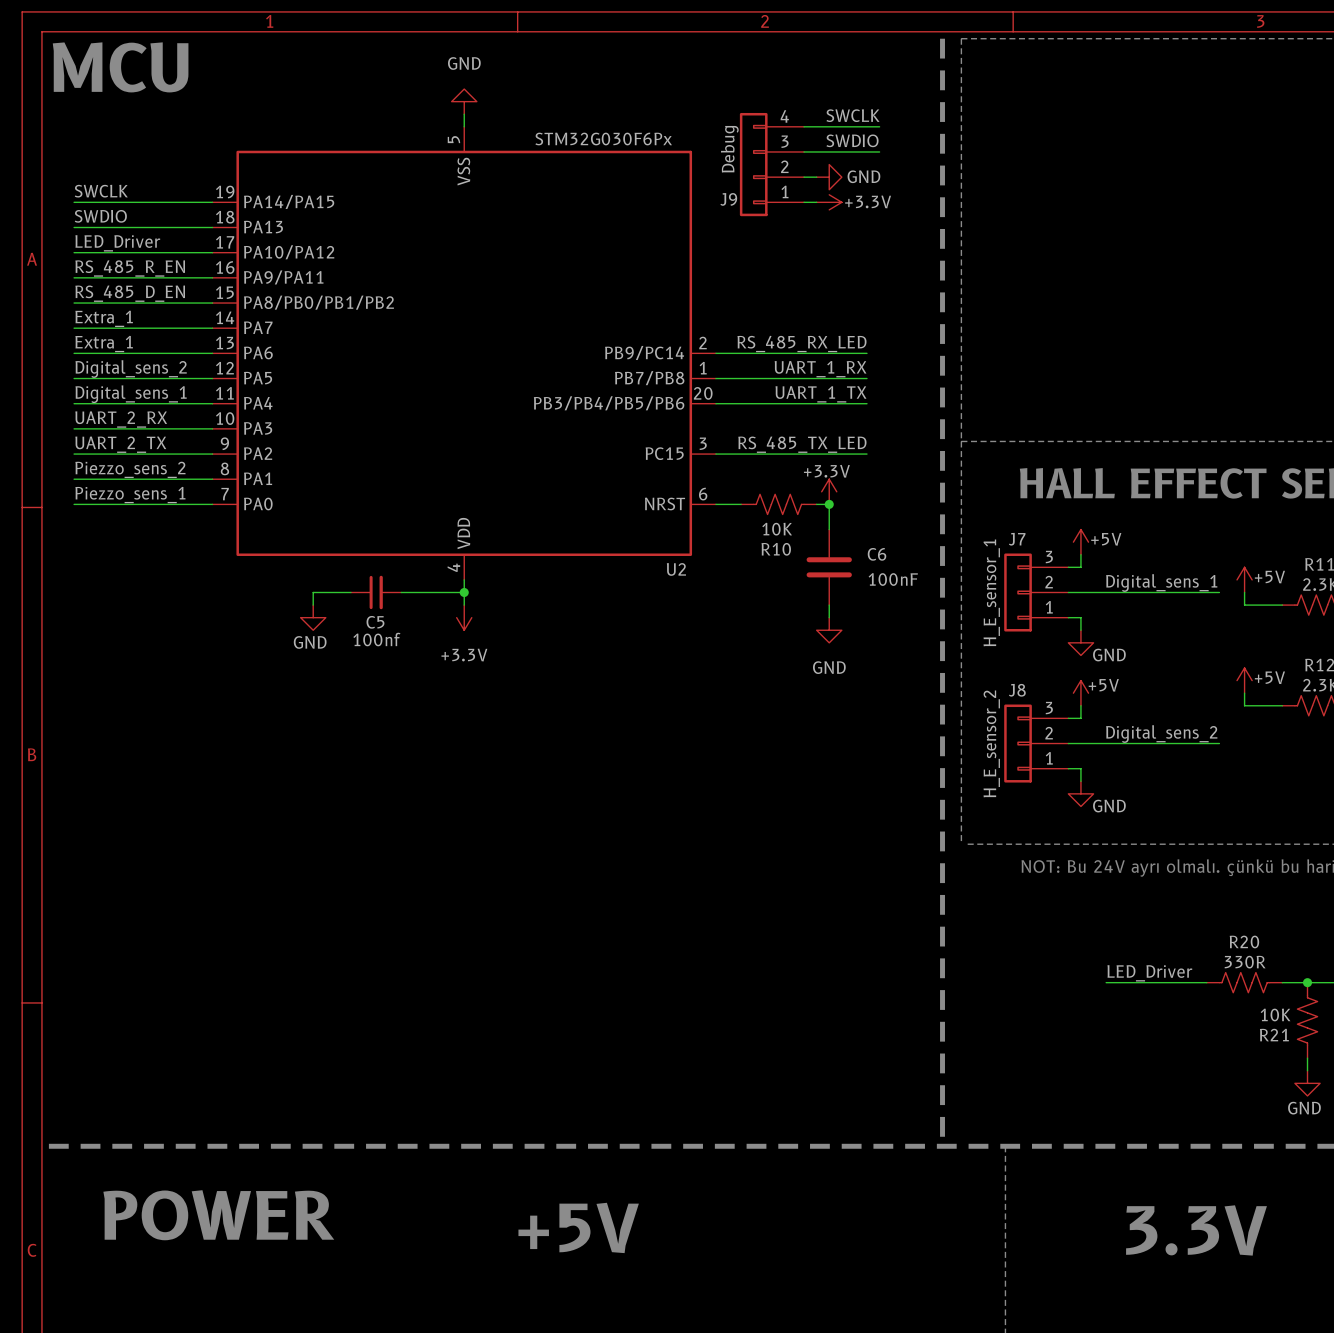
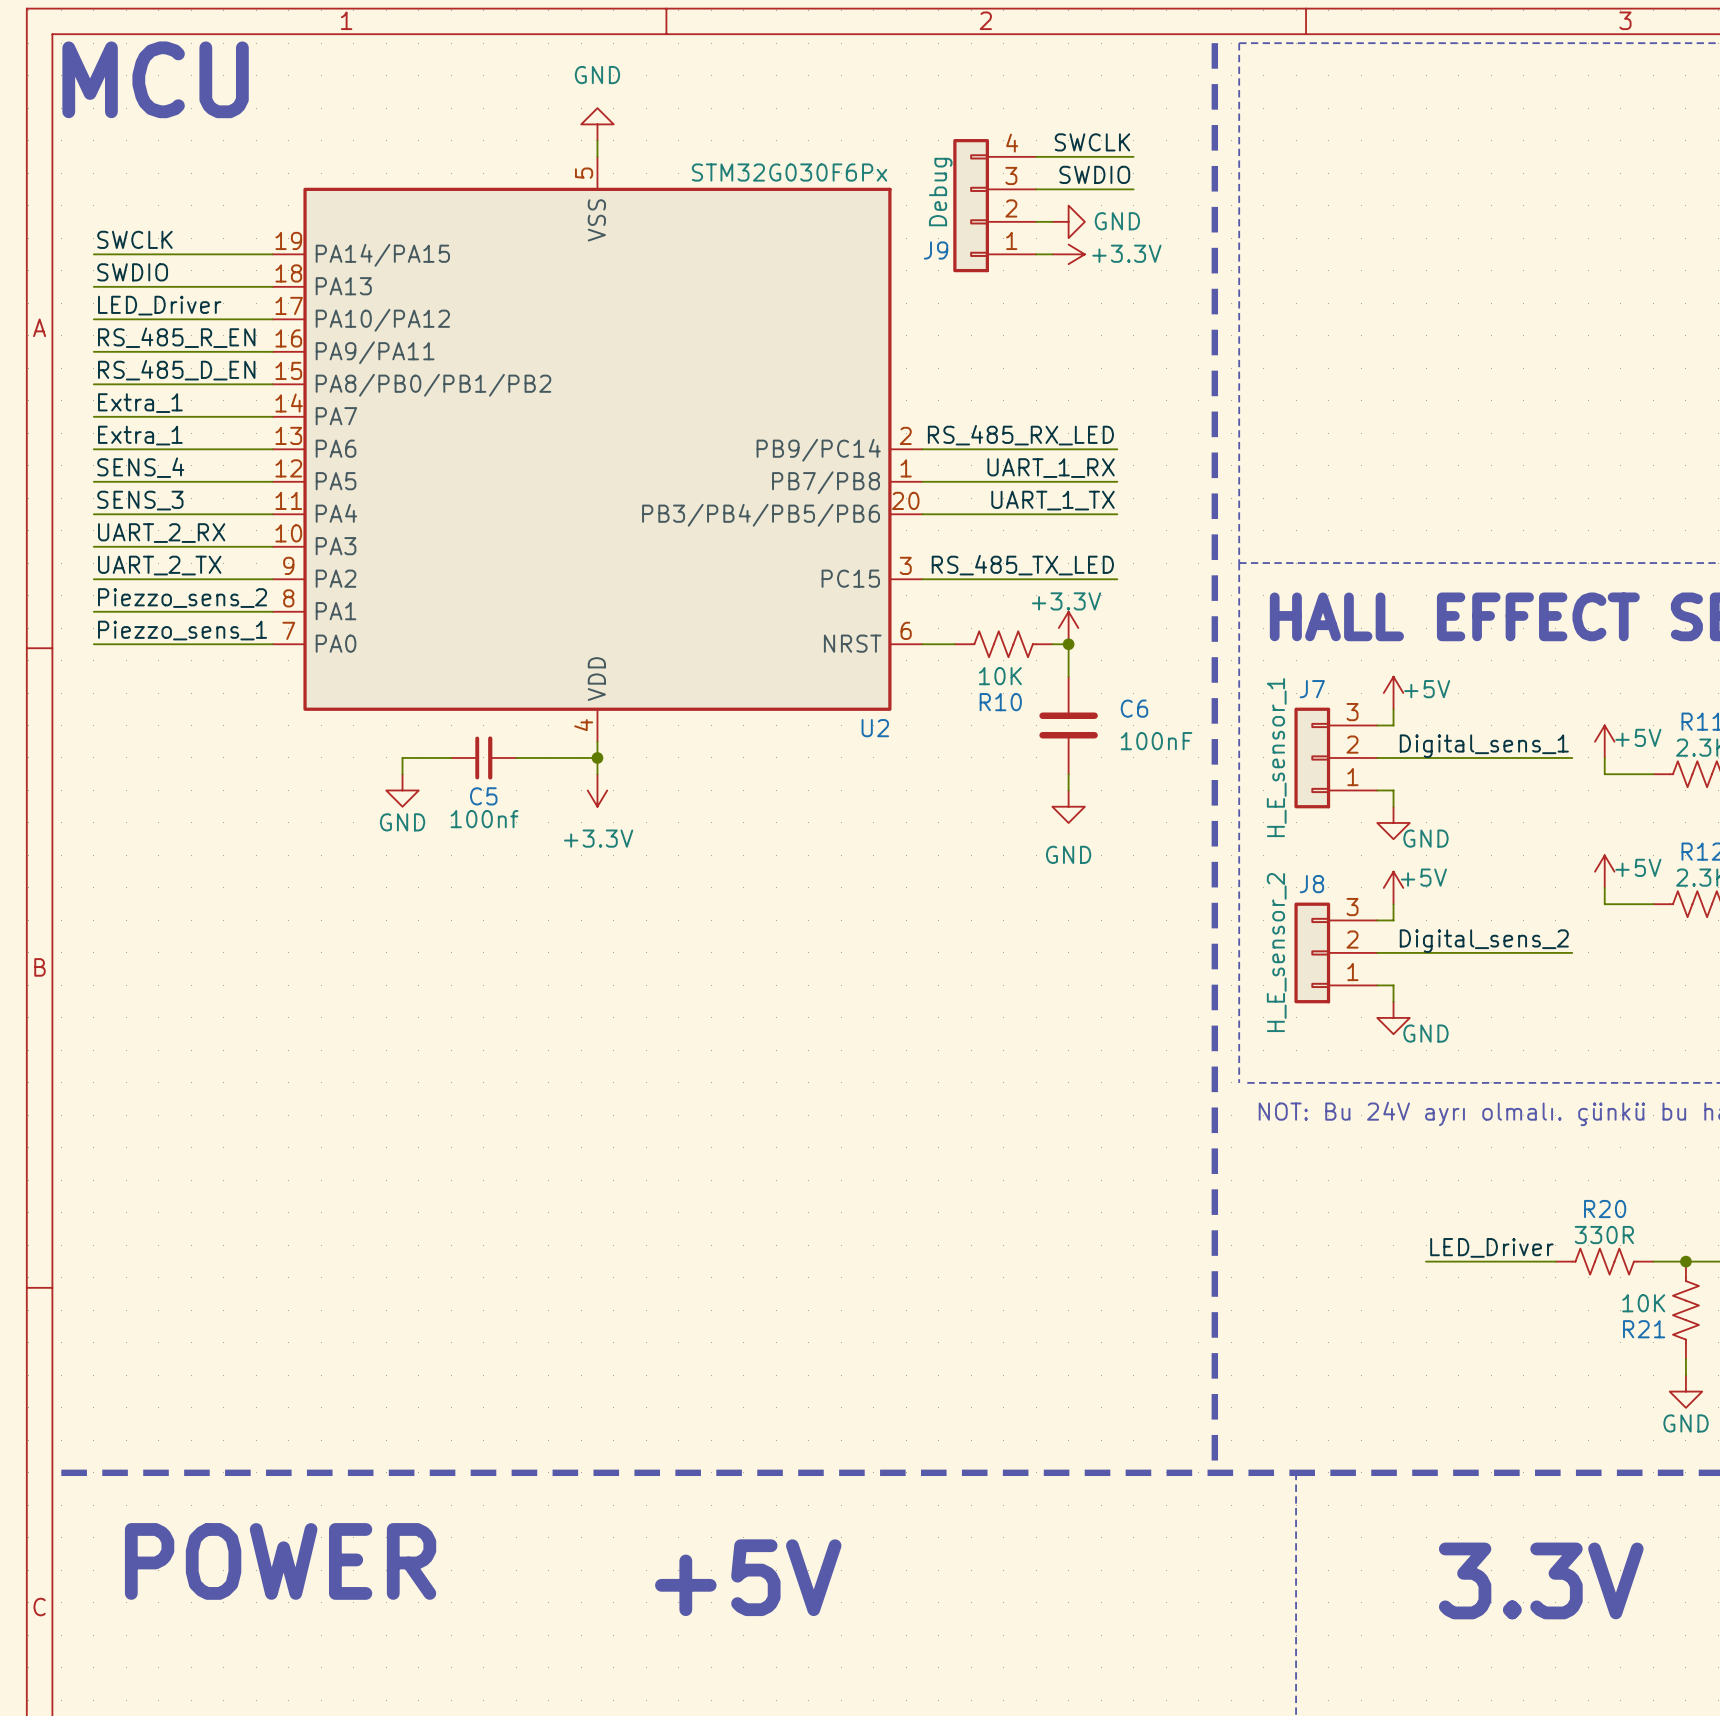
label: Digital_sens_2 (131, 369) -> SENS_4 (140, 467)
label: Digital_sens_1 (131, 394) -> SENS_3 (140, 500)

